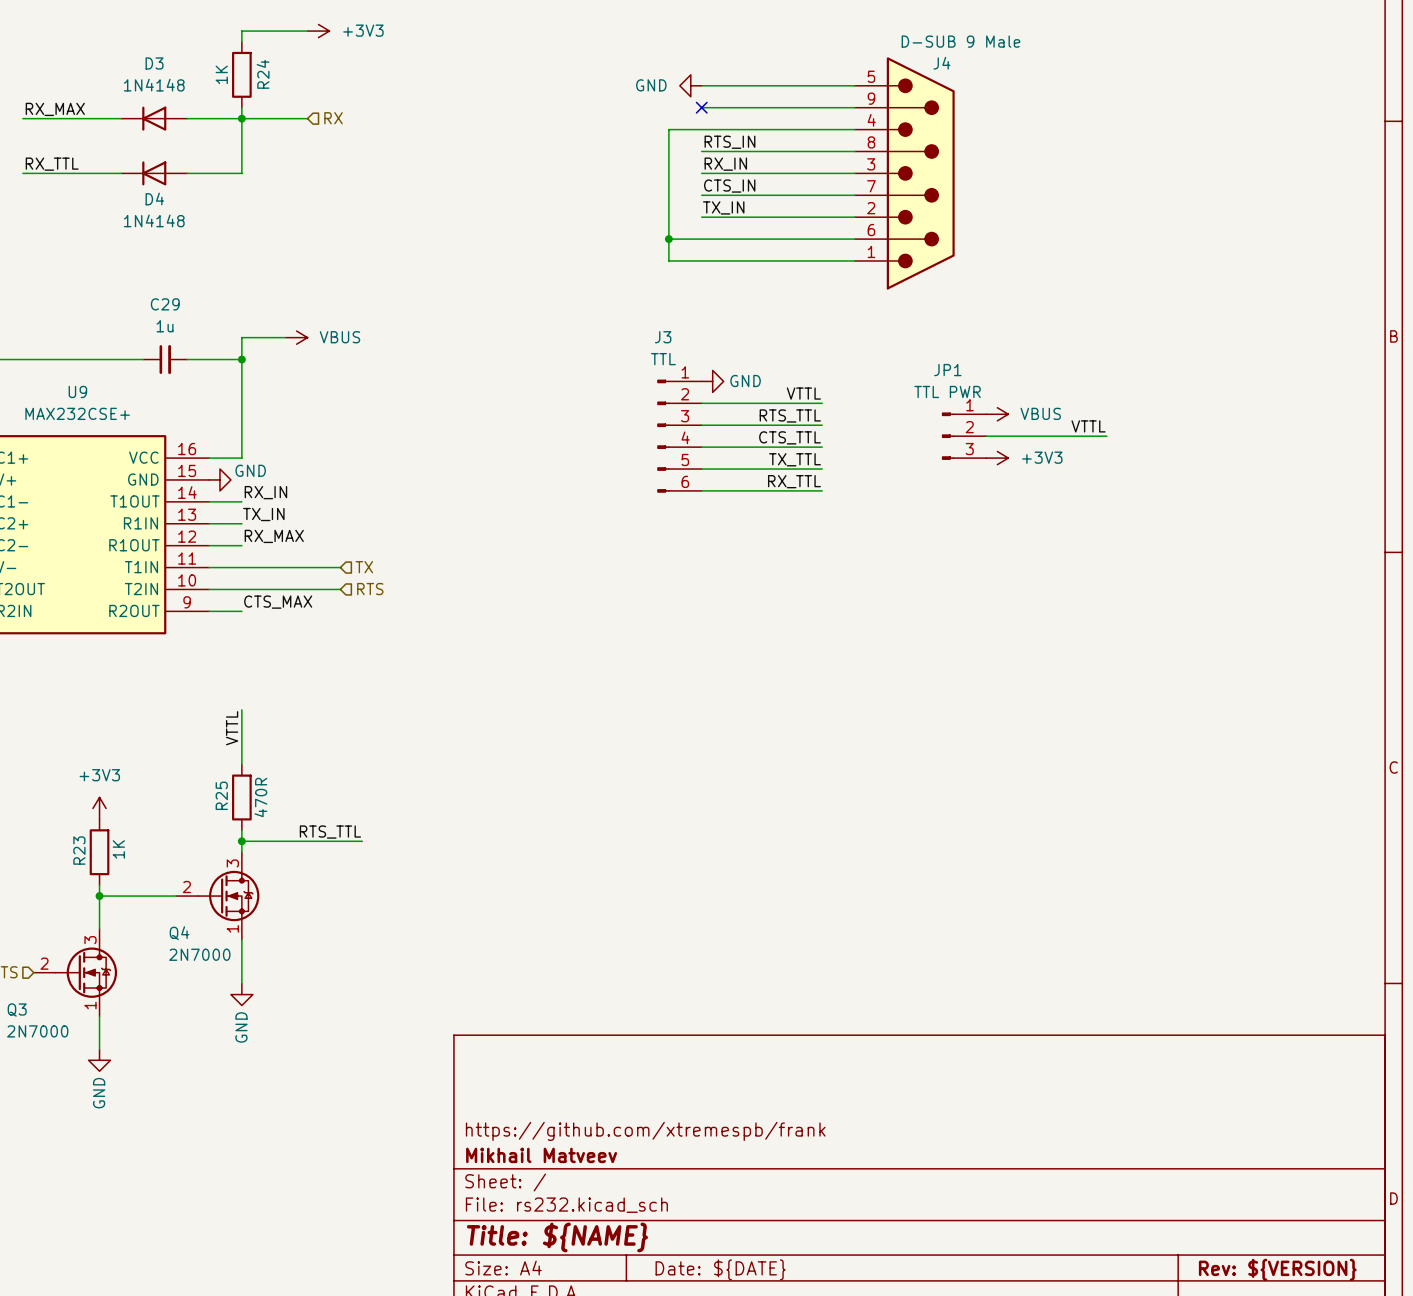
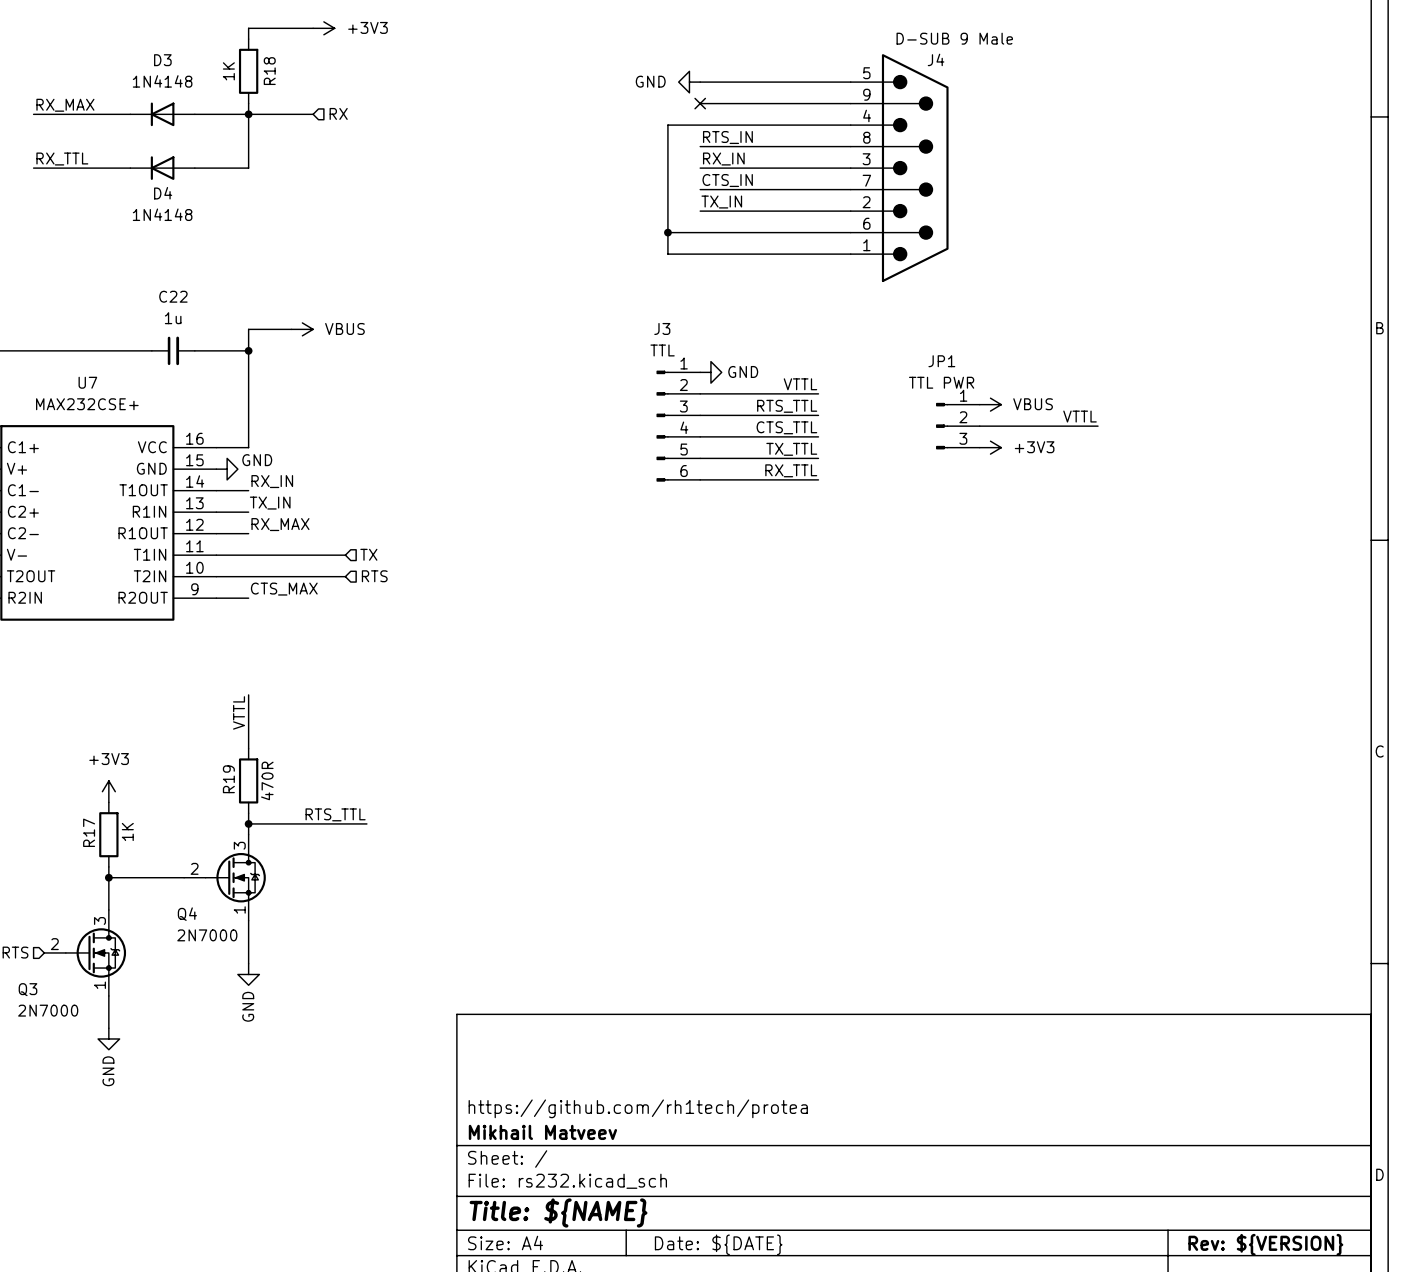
R24 name: R24 (263, 74) -> R18 (269, 71)
C29 name: C29 (165, 304) -> C22 (173, 296)
U9 name: U9 (77, 391) -> U7 (87, 382)
R25 name: R25 (221, 795) -> R19 (228, 779)
R23 name: R23 (79, 850) -> R17 (89, 832)
title block: https://github.com/xtremespb/frank (645, 1131) -> https://github.com/rh1tech/protea (638, 1108)

